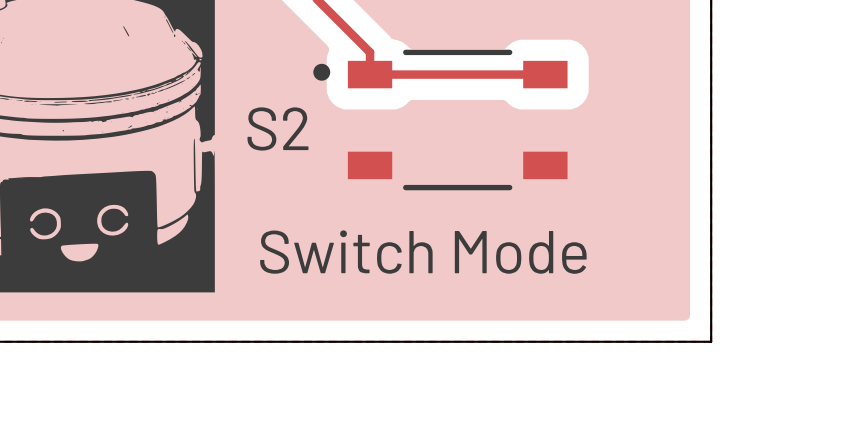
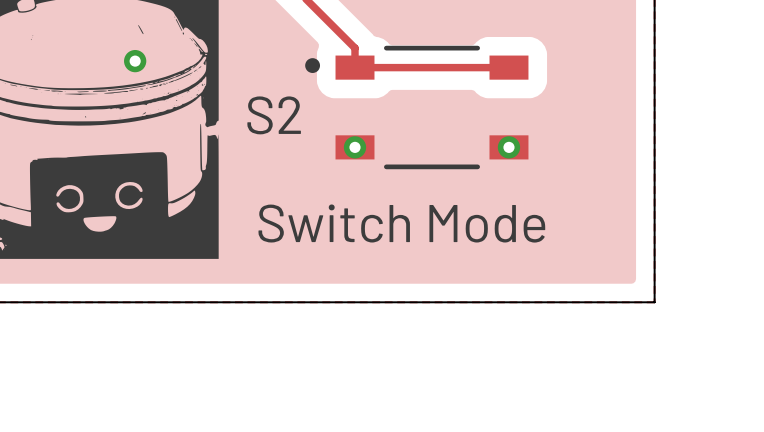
via: none -> (135, 61)
via: none -> (355, 147)
via: none -> (508, 147)

